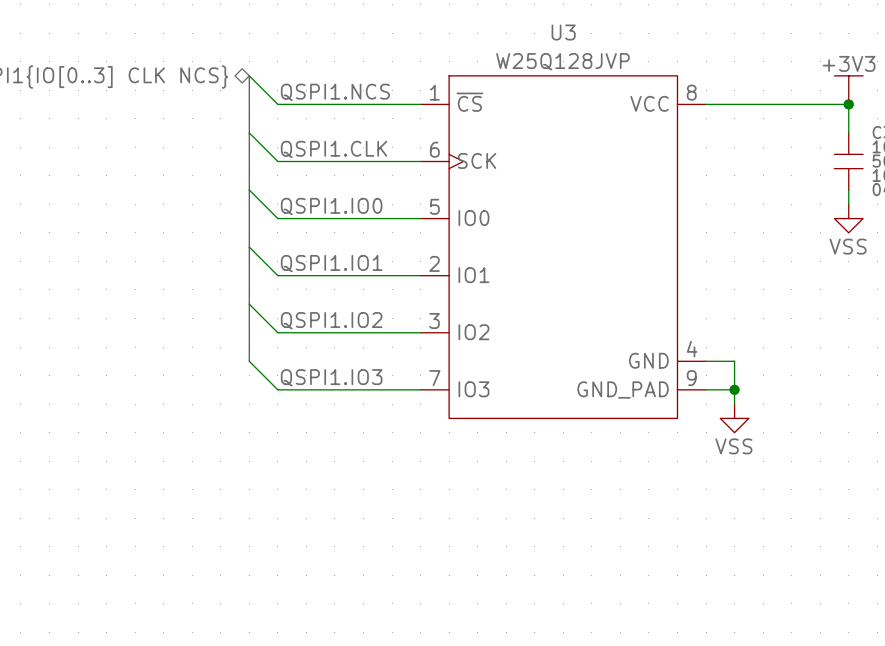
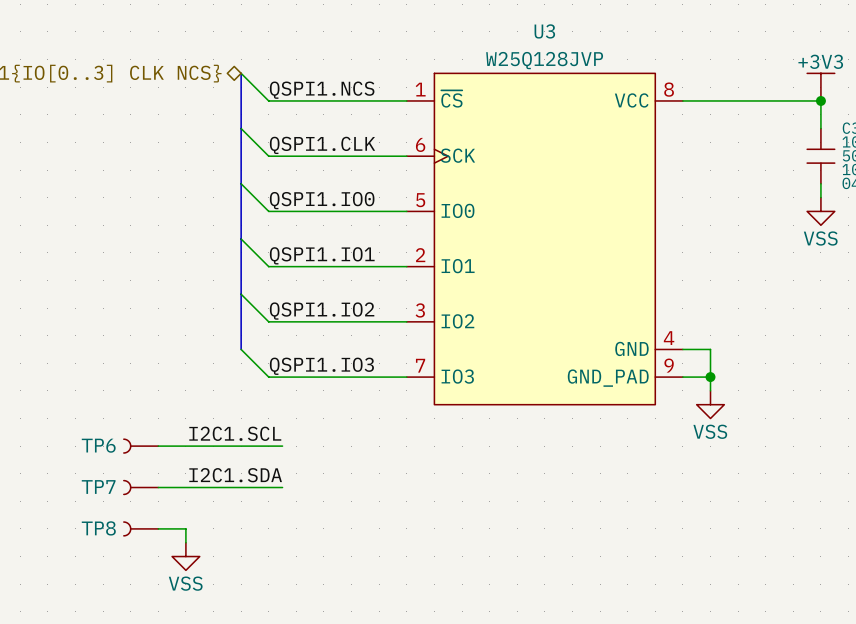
label: none -> I2C1.SCL (235, 433)
TP6: none -> (141, 446)
wire: none -> (158, 446) (282, 446)
label: none -> I2C1.SDA (235, 475)
TP7: none -> (141, 487)
wire: none -> (158, 487) (282, 487)
TP8: none -> (141, 528)
wire: none -> (158, 528) (185, 528) (185, 542)
power symbol: none -> VSS (185, 556)

